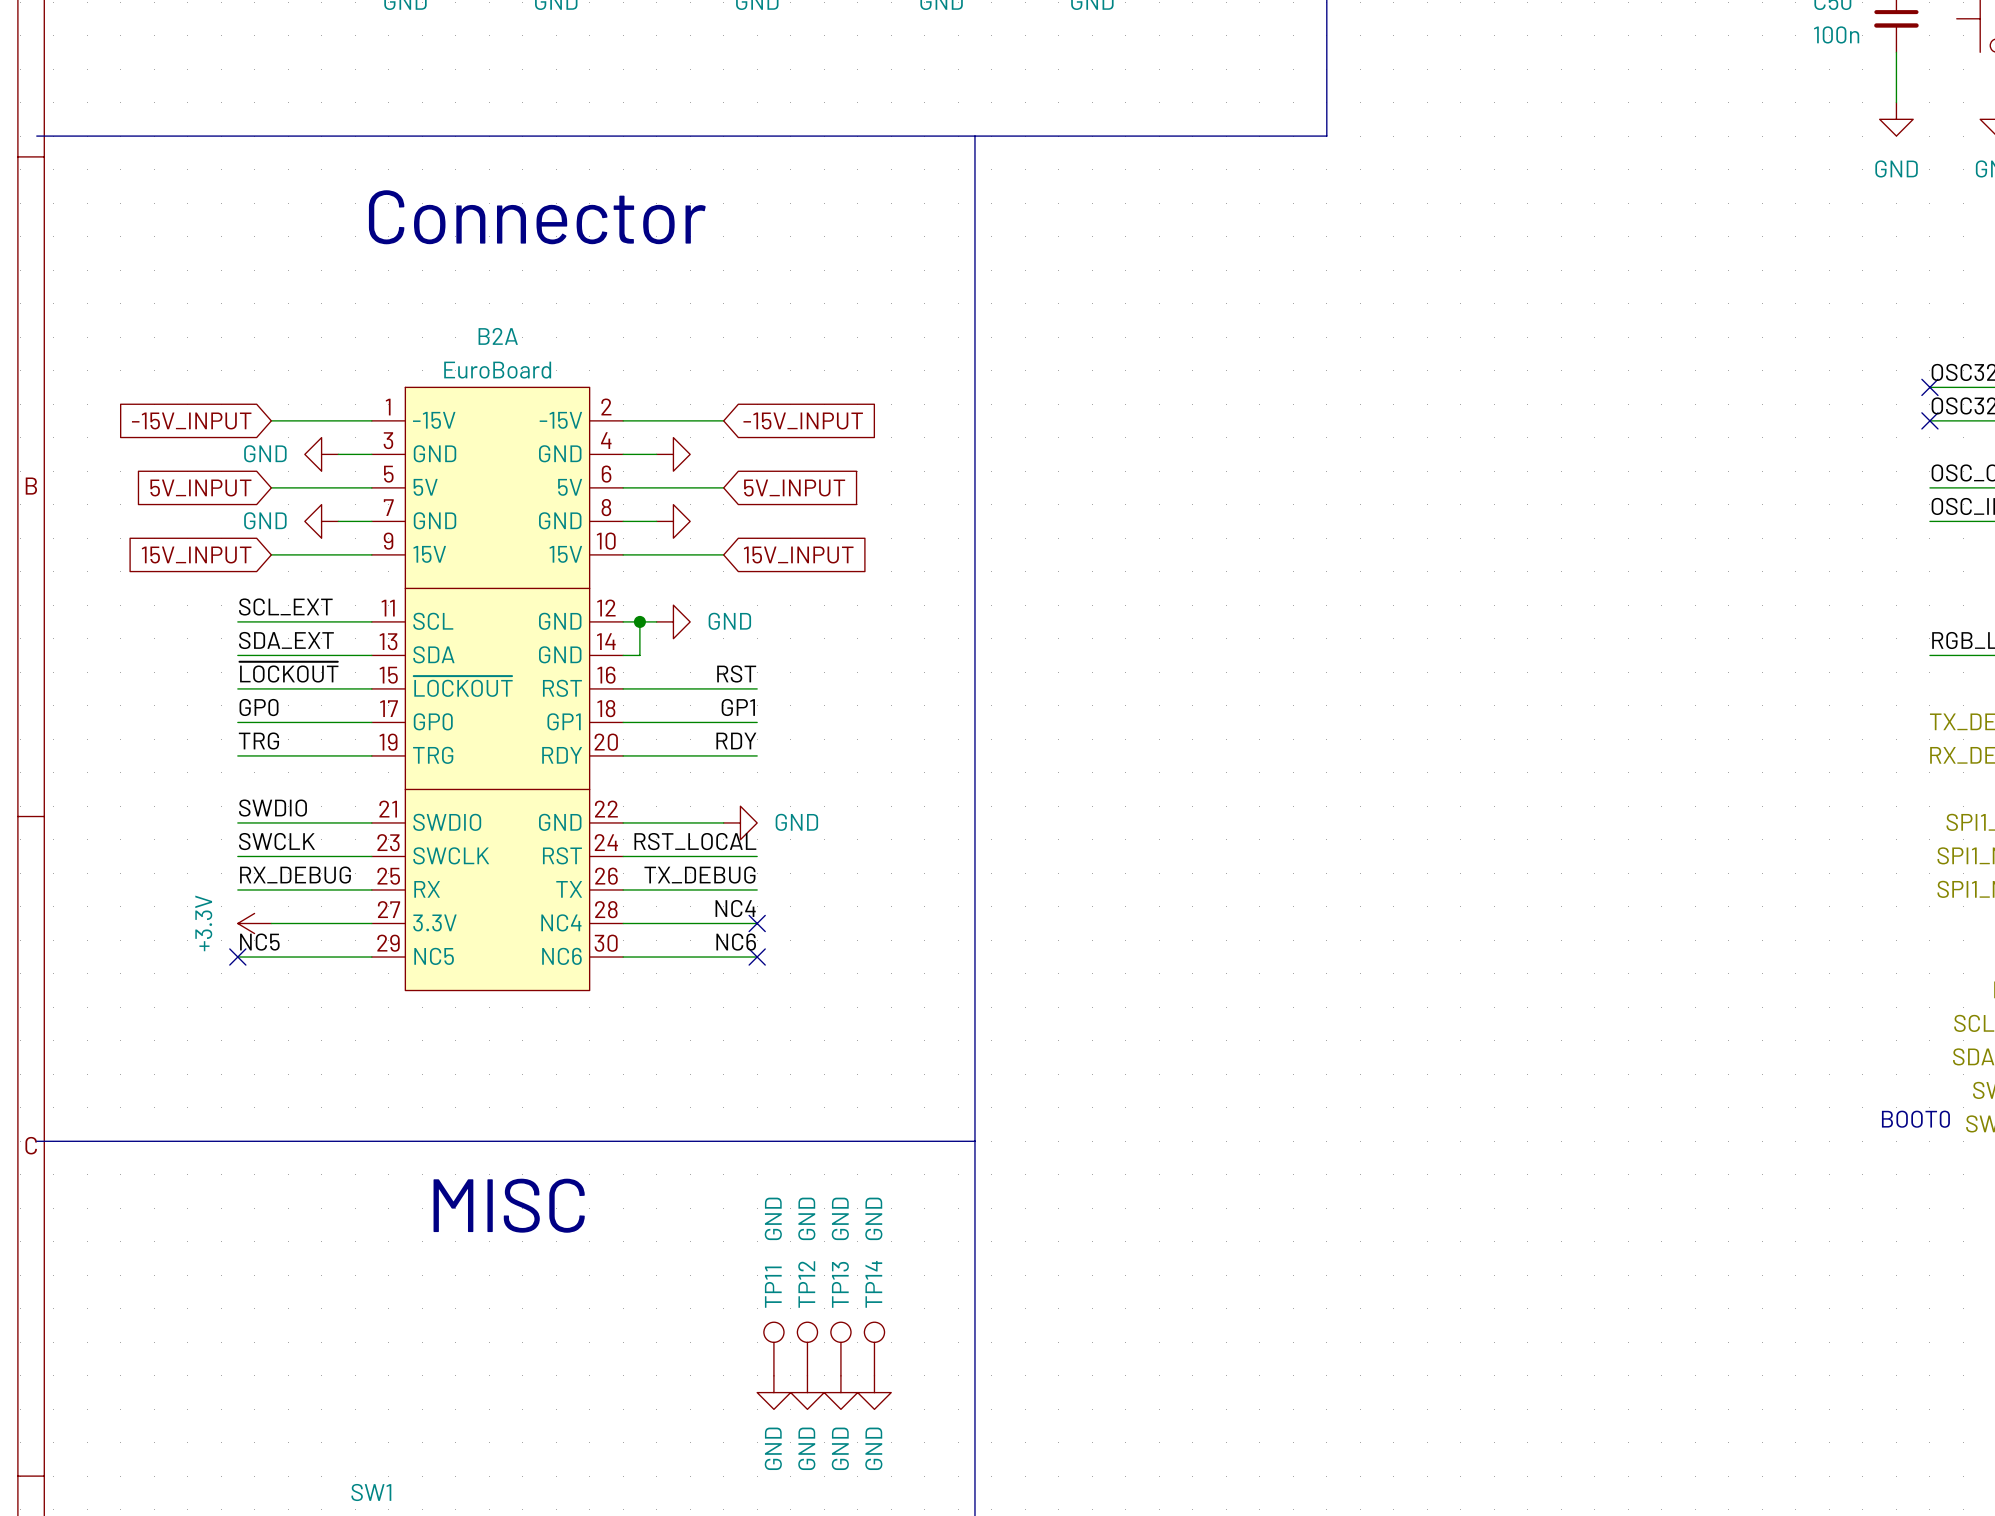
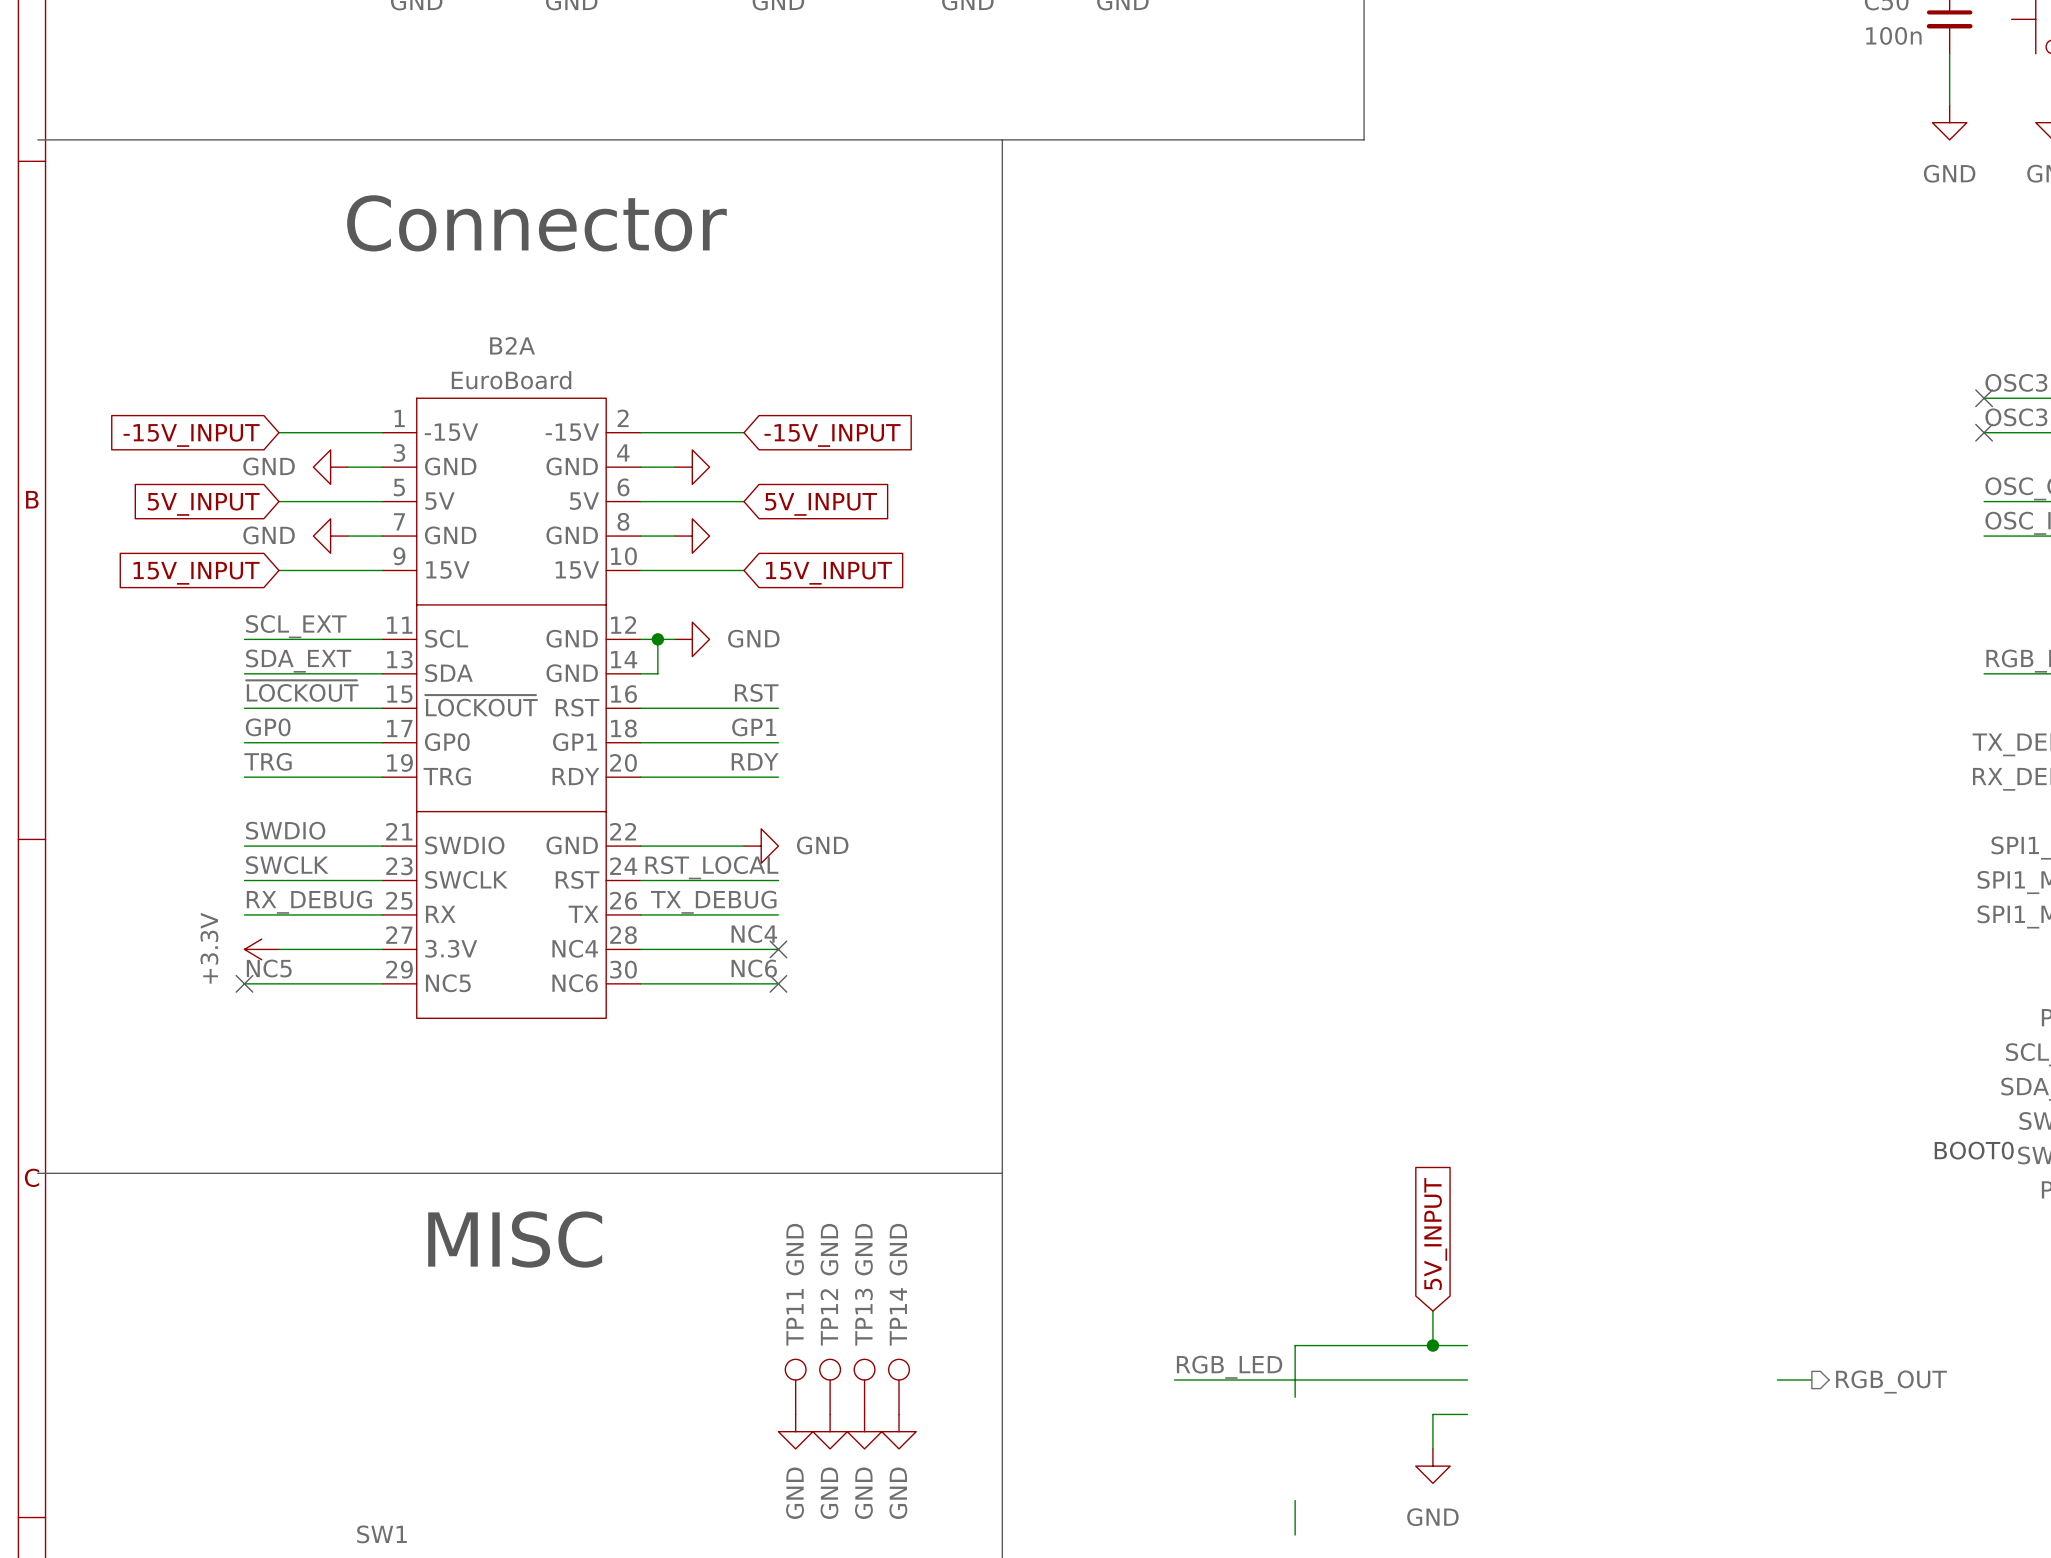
global label: none -> 5V_INPUT (1435, 1233)
wire: none -> (1432, 1311) (1432, 1345)
junction: none -> (1432, 1345)
wire: none -> (1467, 1345) (1295, 1345) (1295, 1397)
label: none -> RGB_LED (1229, 1367)
hierarchical label: none -> RGB_OUT (1891, 1381)
wire: none -> (1174, 1380) (1467, 1380)
wire: none -> (1777, 1380) (1811, 1380)
wire: none -> (1467, 1414) (1432, 1414) (1432, 1448)
power symbol: none -> GND (1432, 1466)
wire: none -> (1295, 1500) (1295, 1535)

